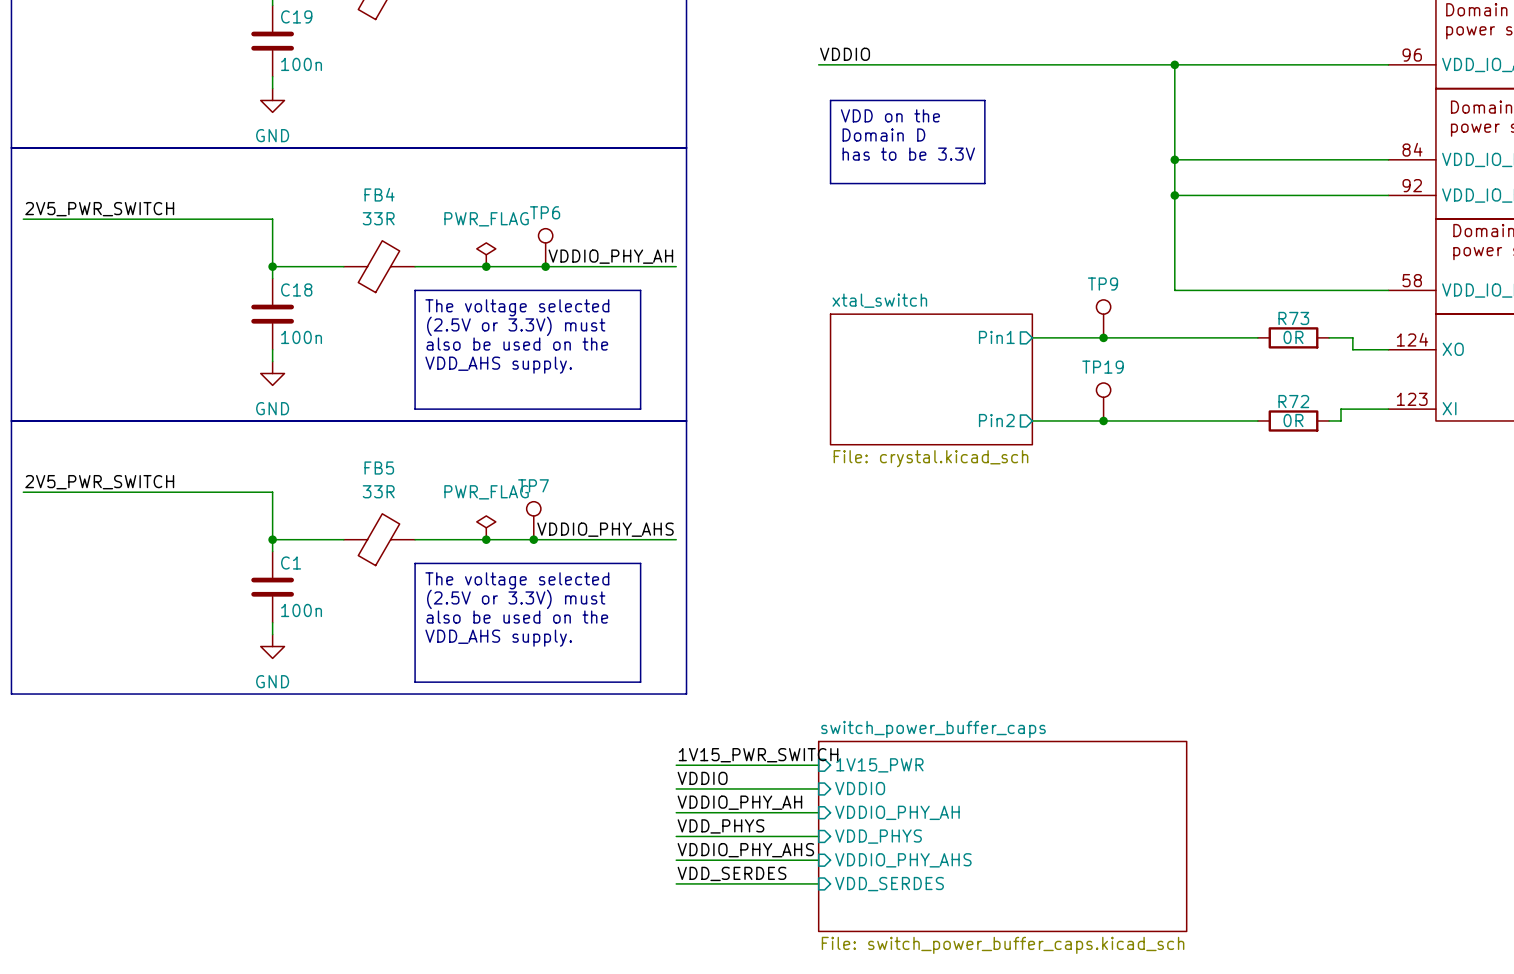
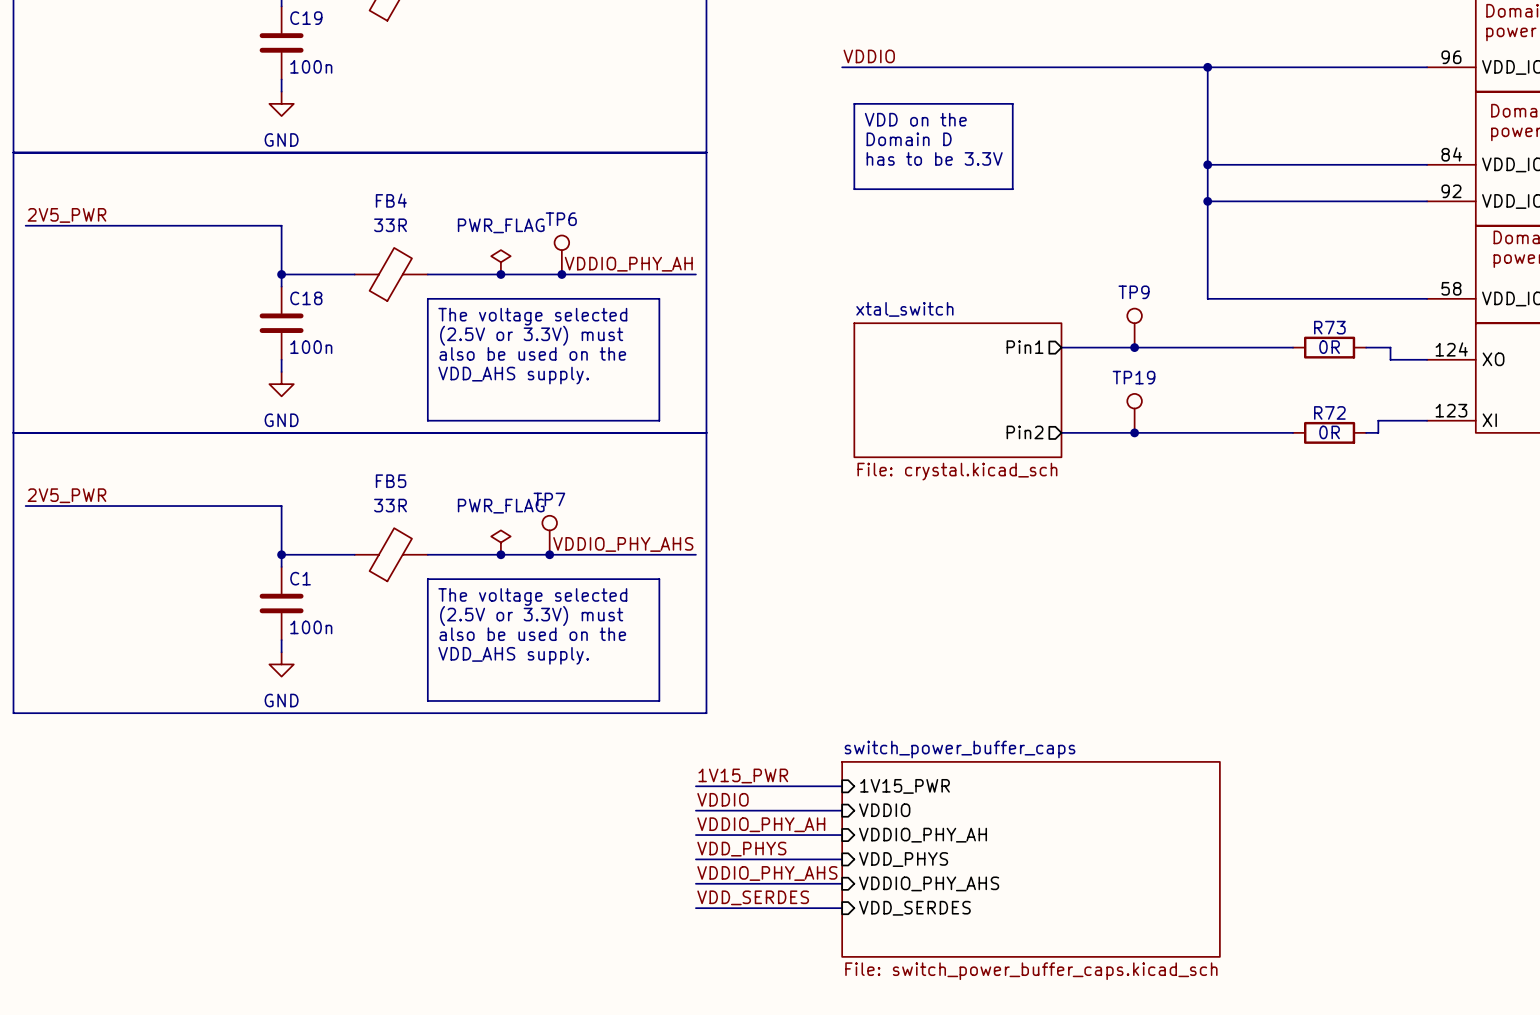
label: 2V5_PWR_SWITCH (99, 209) -> 2V5_PWR (66, 215)
label: 2V5_PWR_SWITCH (99, 482) -> 2V5_PWR (66, 495)
label: 1V15_PWR_SWITCH (758, 755) -> 1V15_PWR (743, 775)

